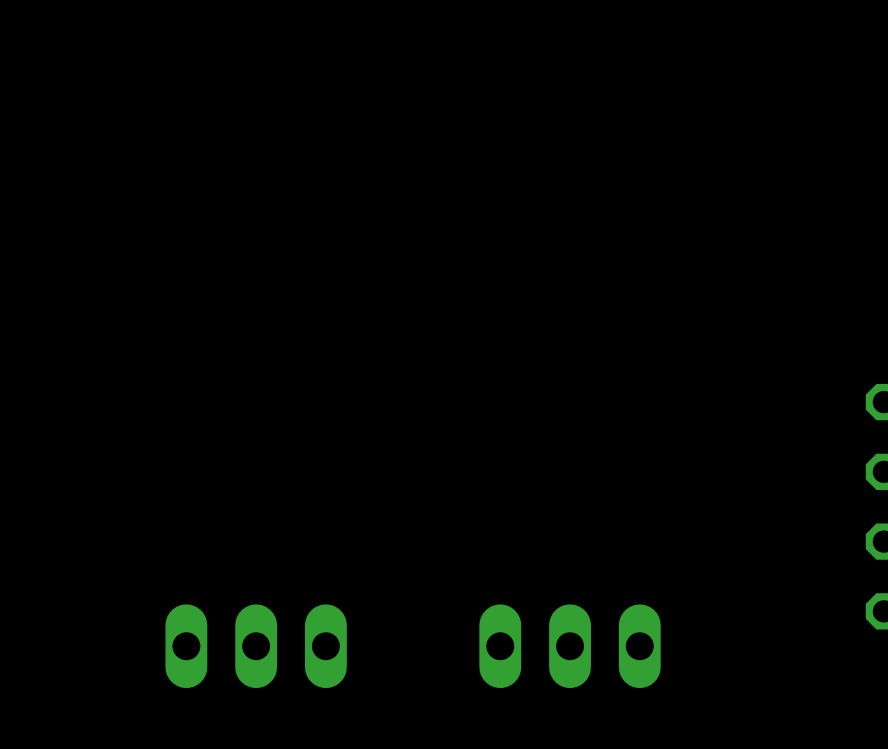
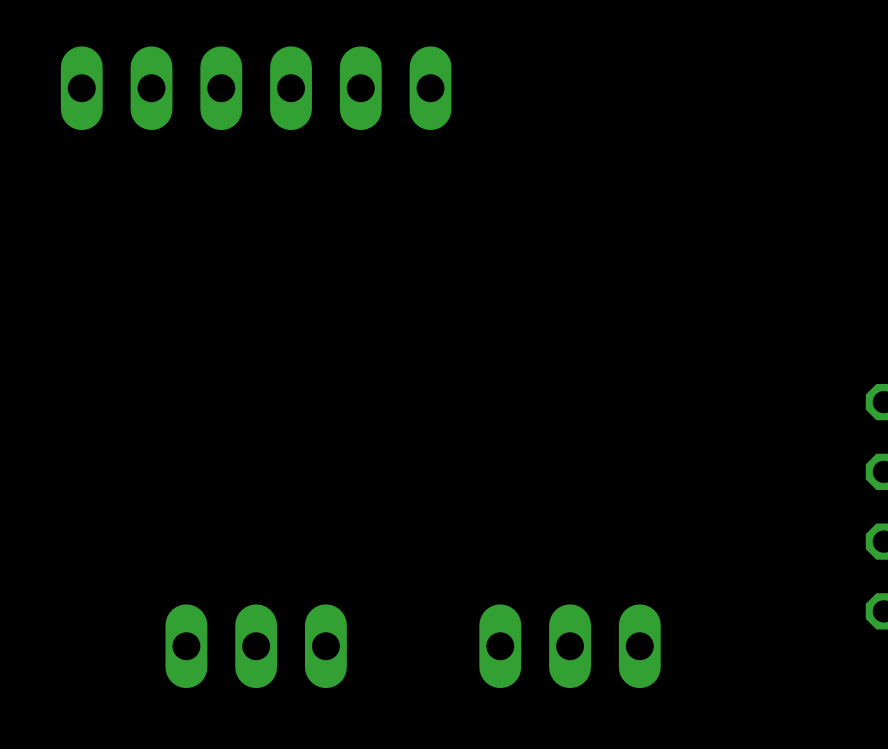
part: none -> (256, 88)

